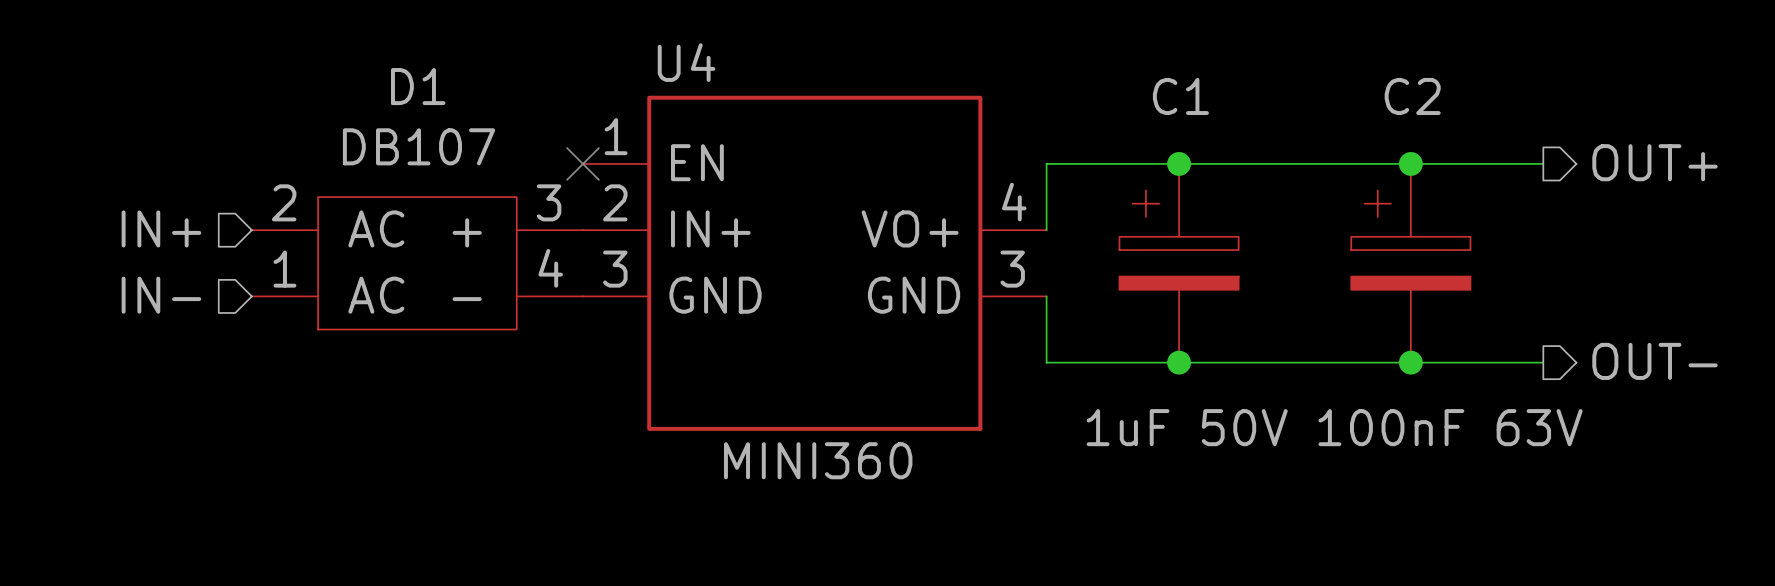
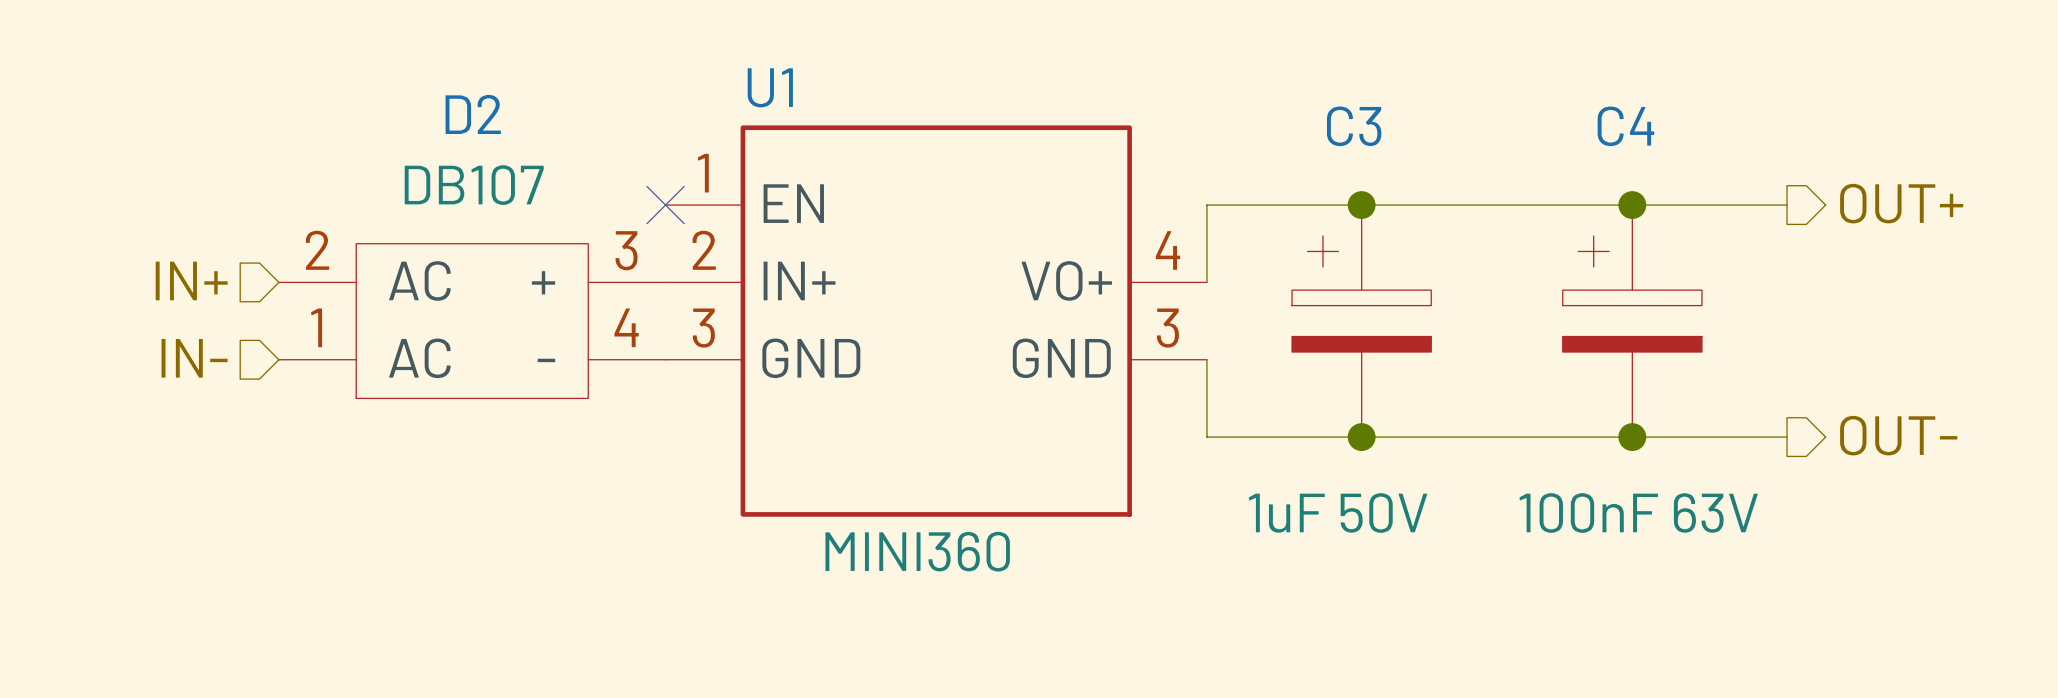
U4 name: U4 (686, 62) -> U1 (770, 87)
D1 name: D1 (418, 86) -> D2 (473, 114)
C1 name: C1 (1180, 96) -> C3 (1354, 126)
C2 name: C2 (1412, 96) -> C4 (1625, 126)

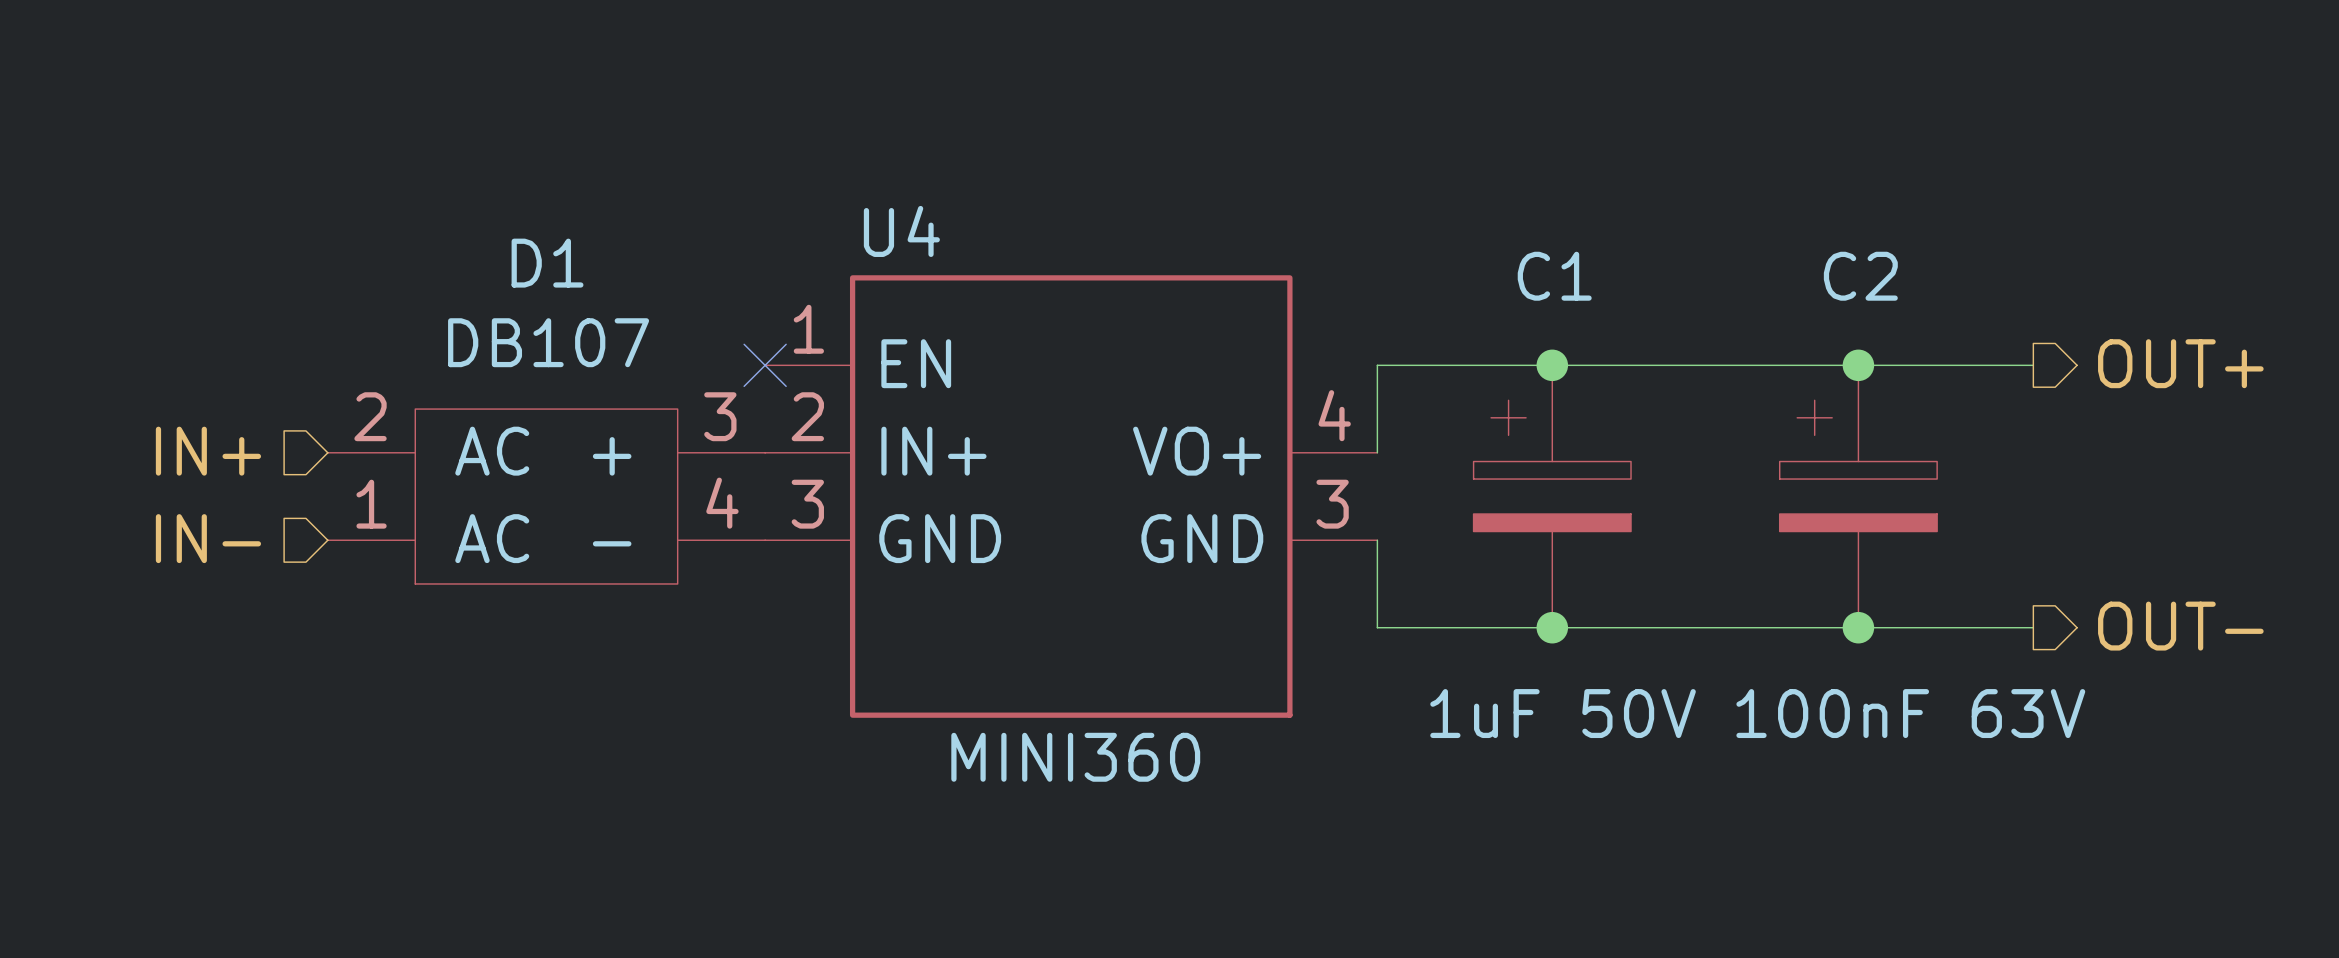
U1 name: U1 (770, 87) -> U4 (901, 231)
D2 name: D2 (473, 114) -> D1 (547, 263)
C3 name: C3 (1354, 126) -> C1 (1554, 276)
C4 name: C4 (1625, 126) -> C2 (1860, 276)

